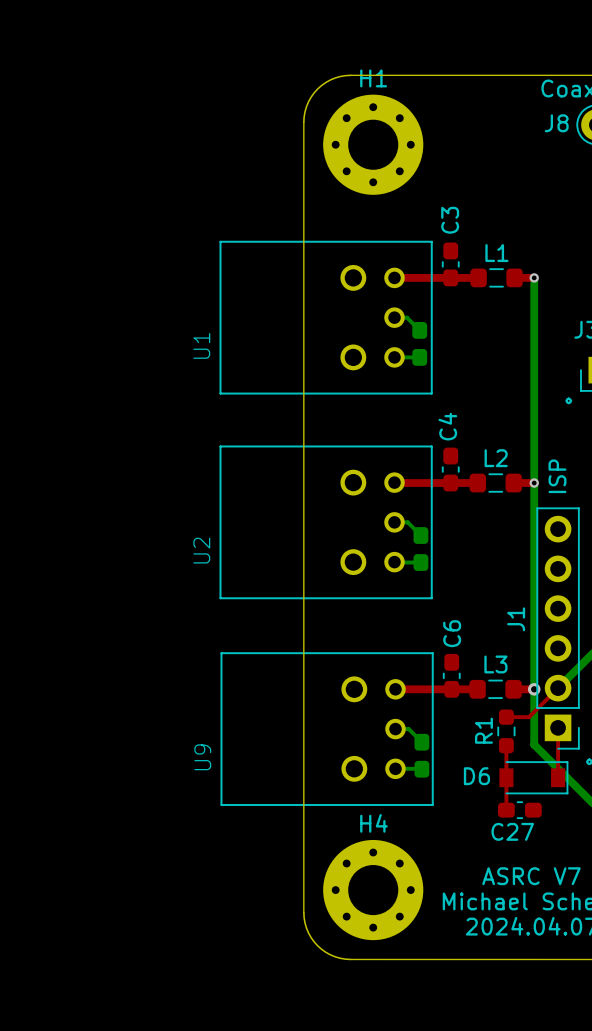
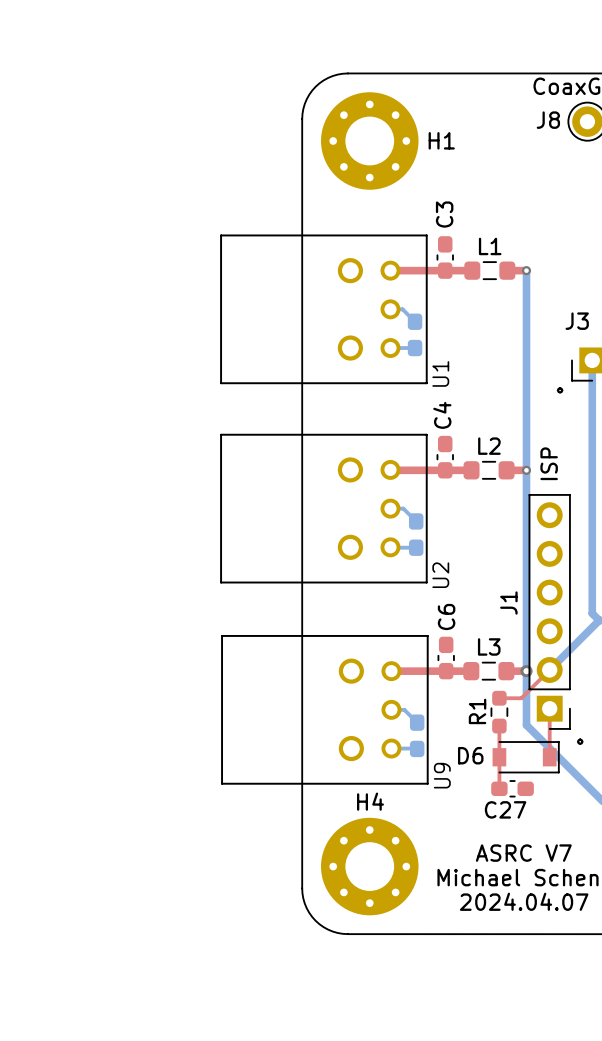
H1 name position: H1 (373, 78) -> H1 (441, 140)
U1 name position: U1 (201, 345) -> U1 (440, 373)
U2 name position: U2 (201, 550) -> U2 (440, 575)
U9 name position: U9 (202, 757) -> U9 (442, 775)

